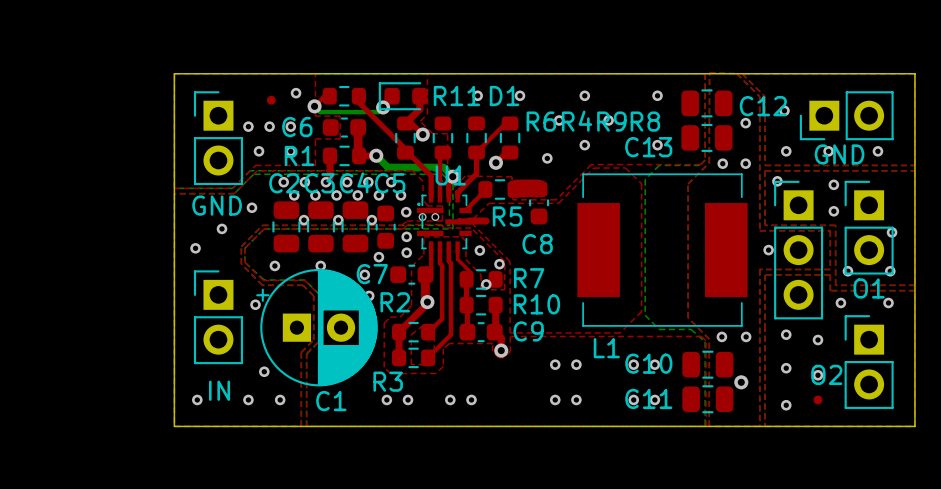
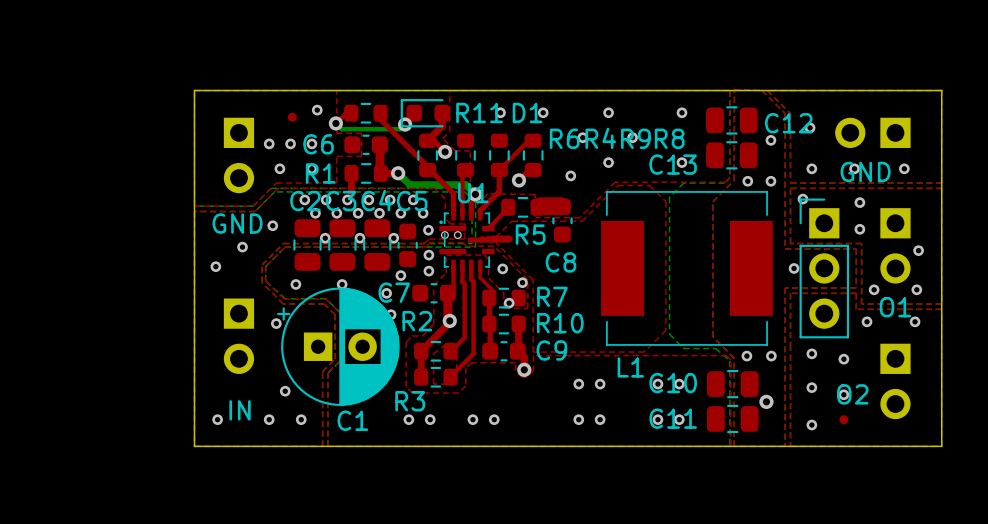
part side: top (846, 115) -> bottom (872, 132)
part side: top (218, 138) -> bottom (238, 155)
part side: top (869, 227) -> bottom (895, 245)
part side: top (218, 317) -> bottom (238, 336)
part side: top (869, 362) -> bottom (895, 381)

